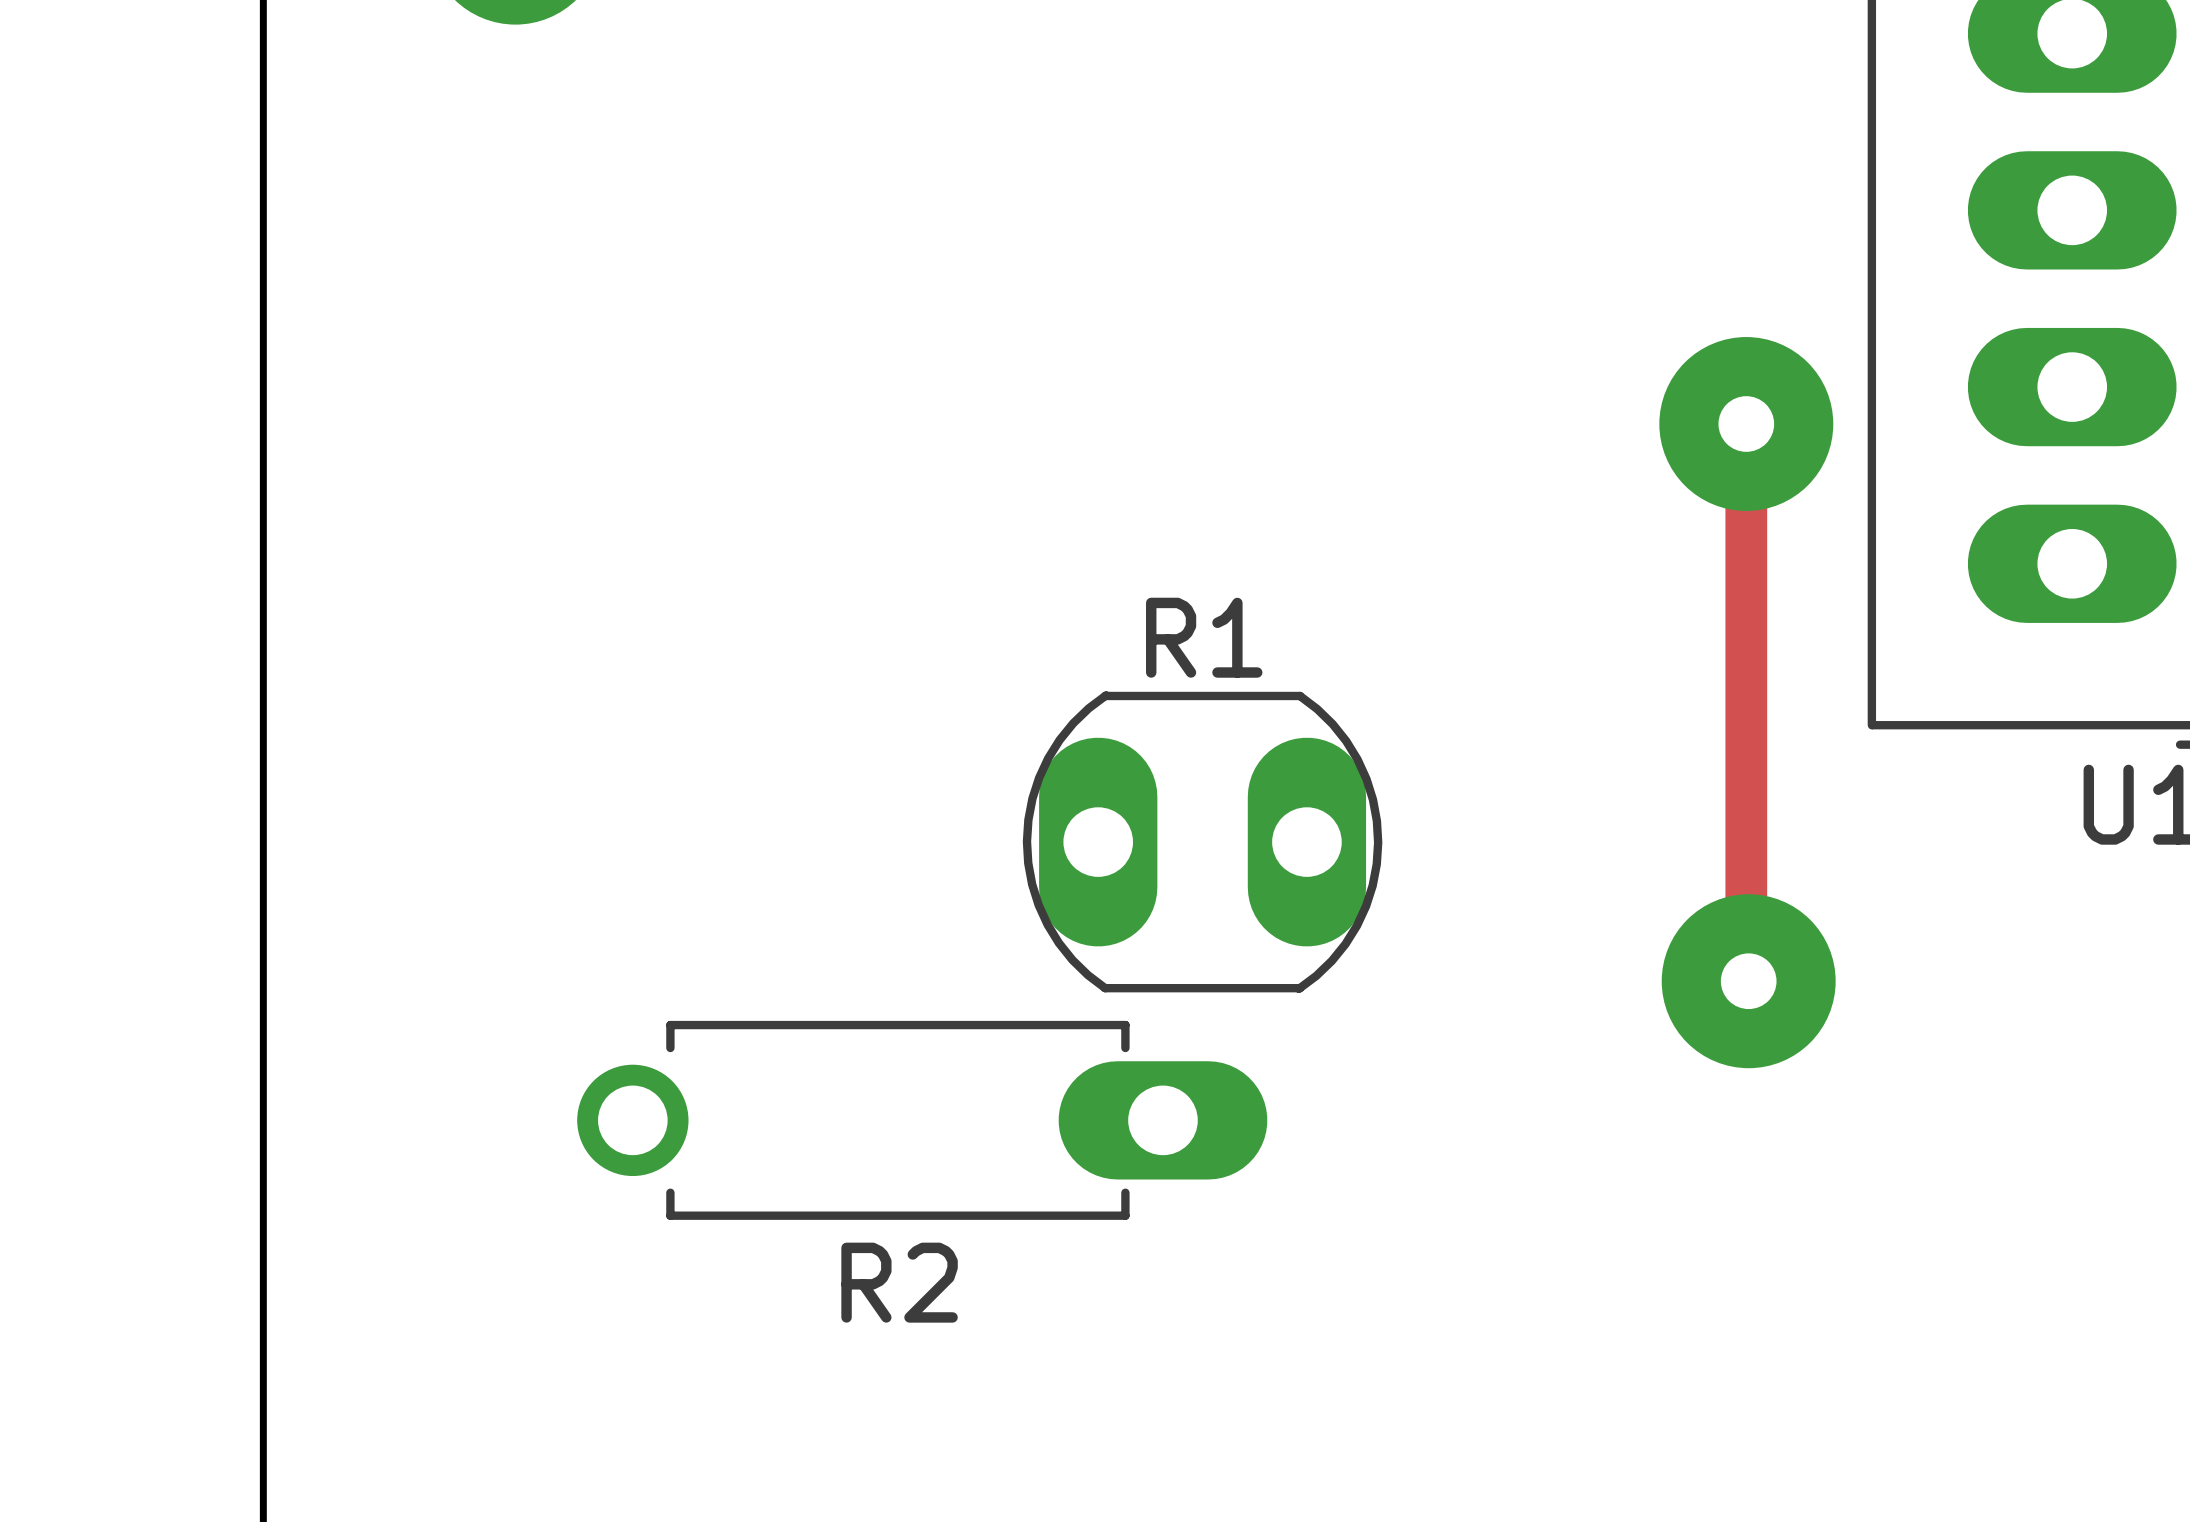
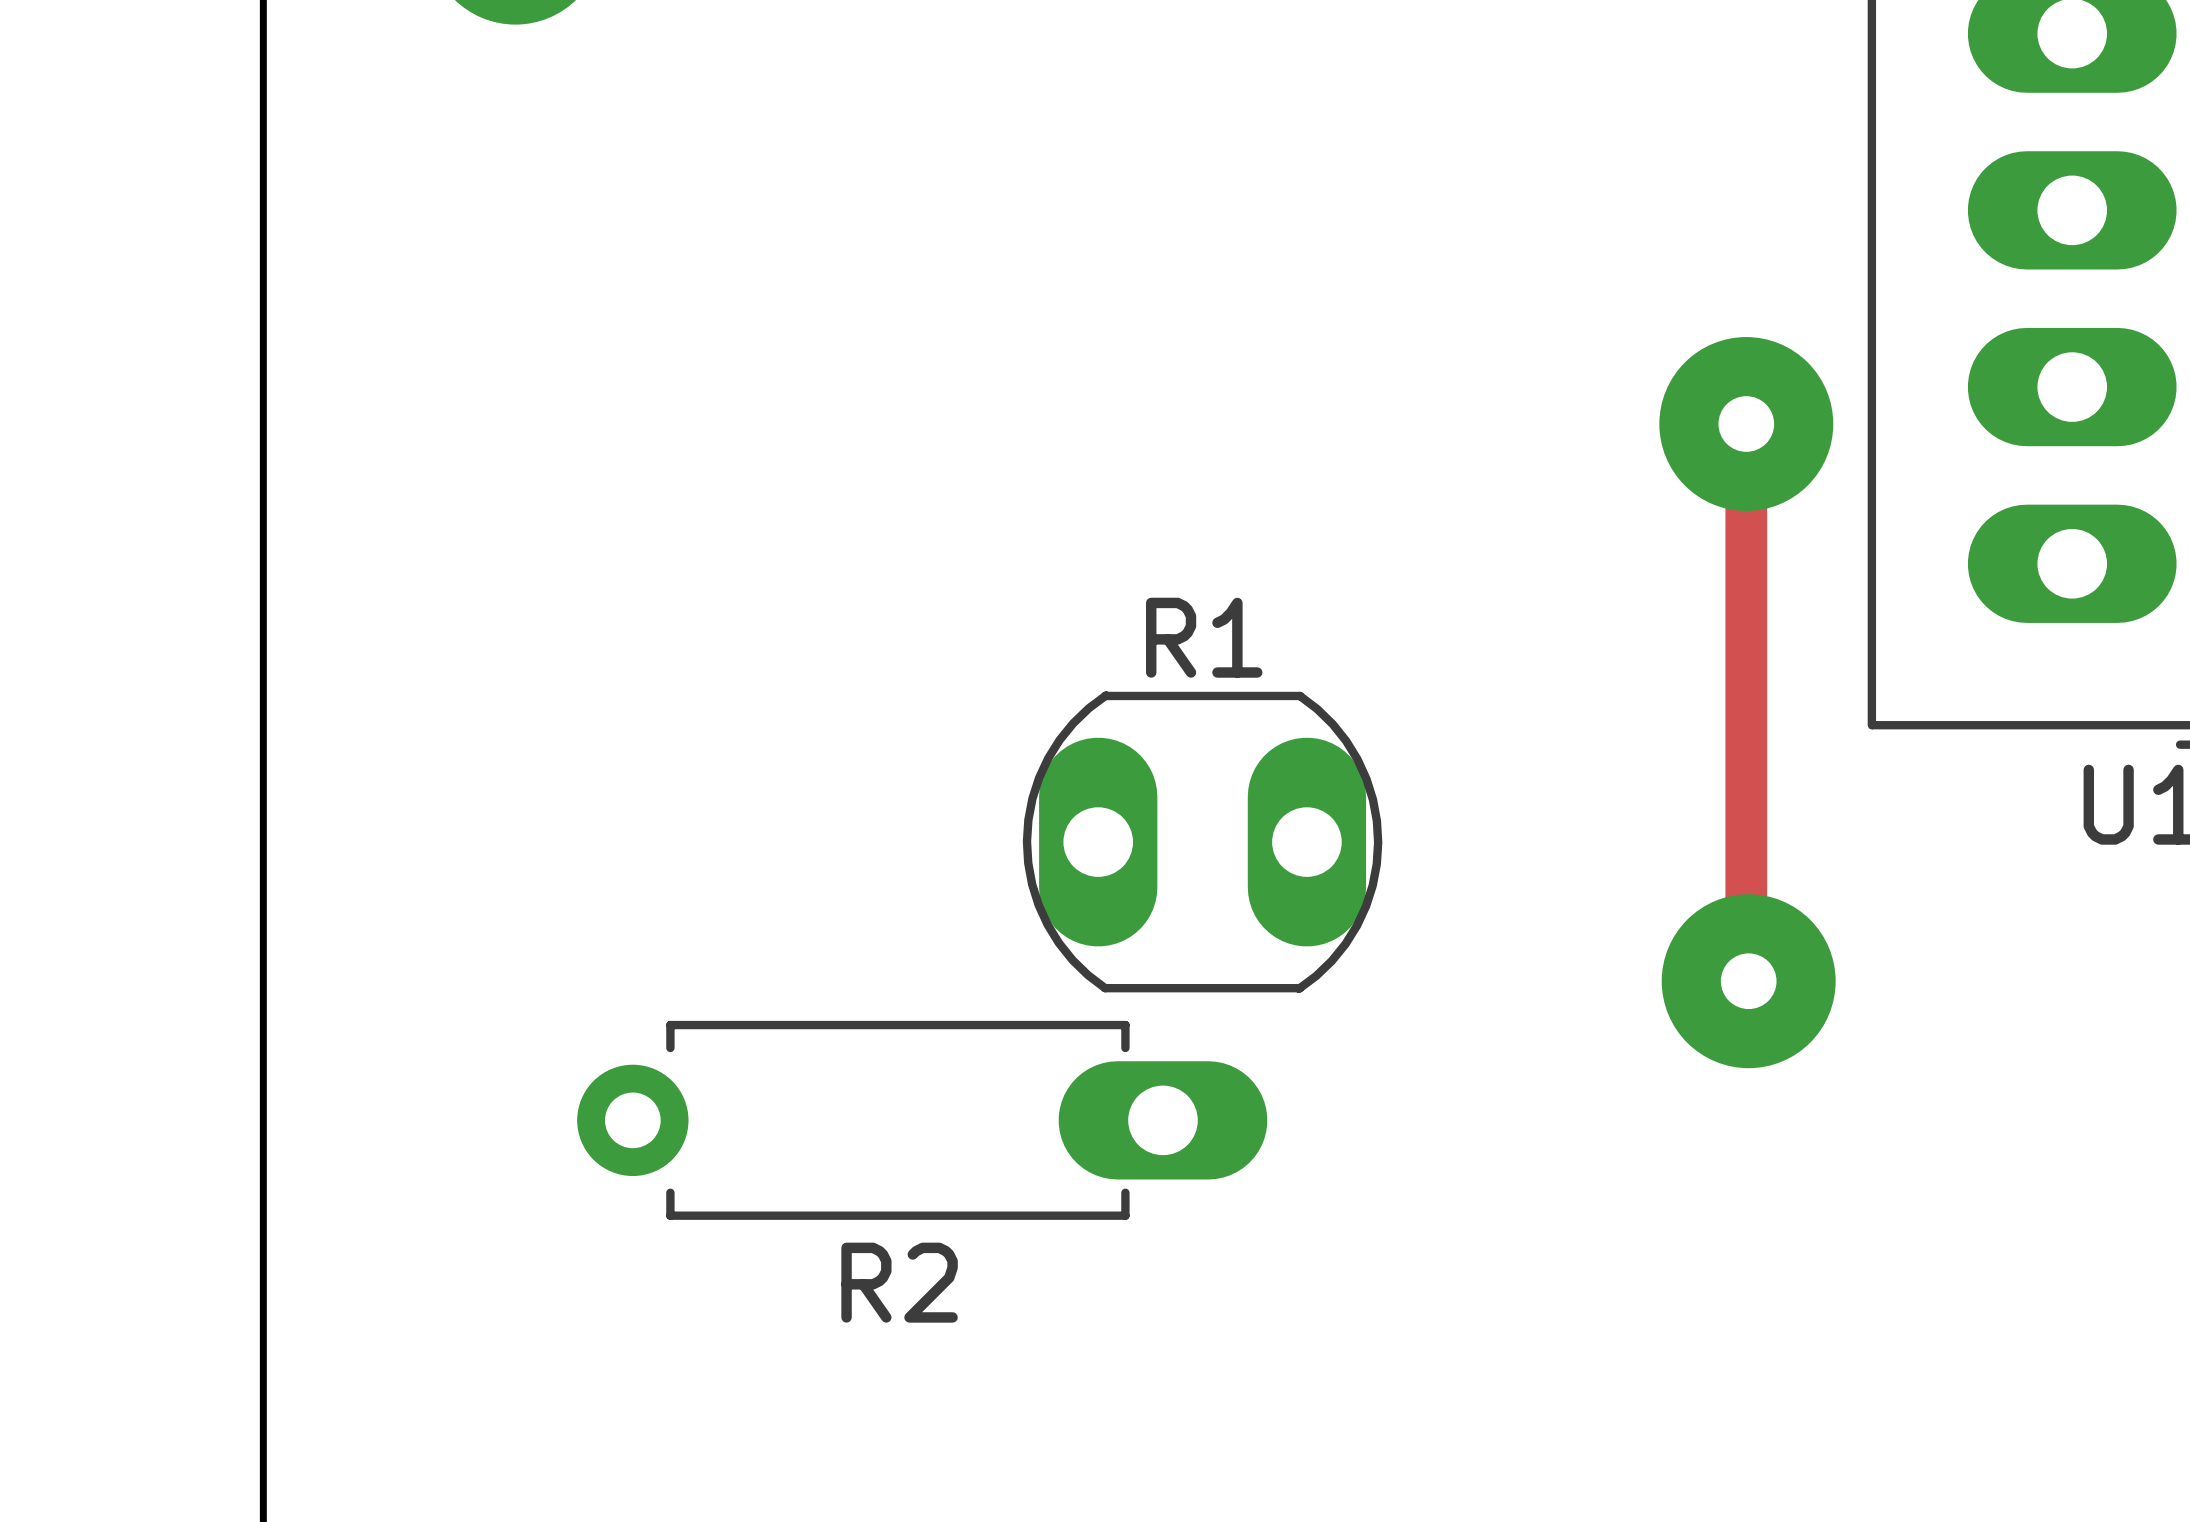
R2 footprint: [577, 1020, 1268, 1220] -> [577, 1020, 1268, 1220]

